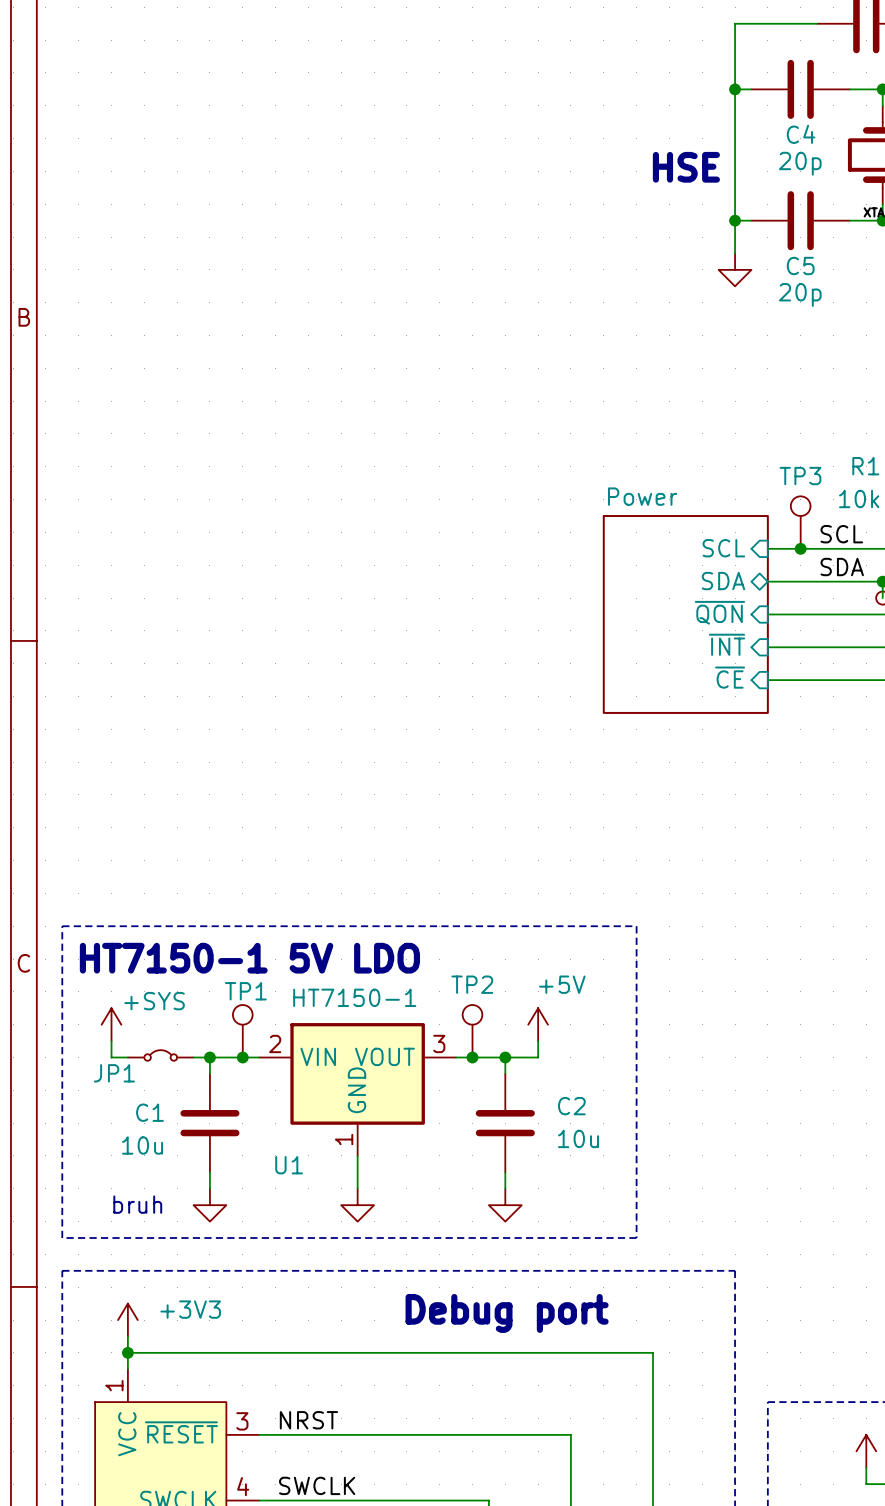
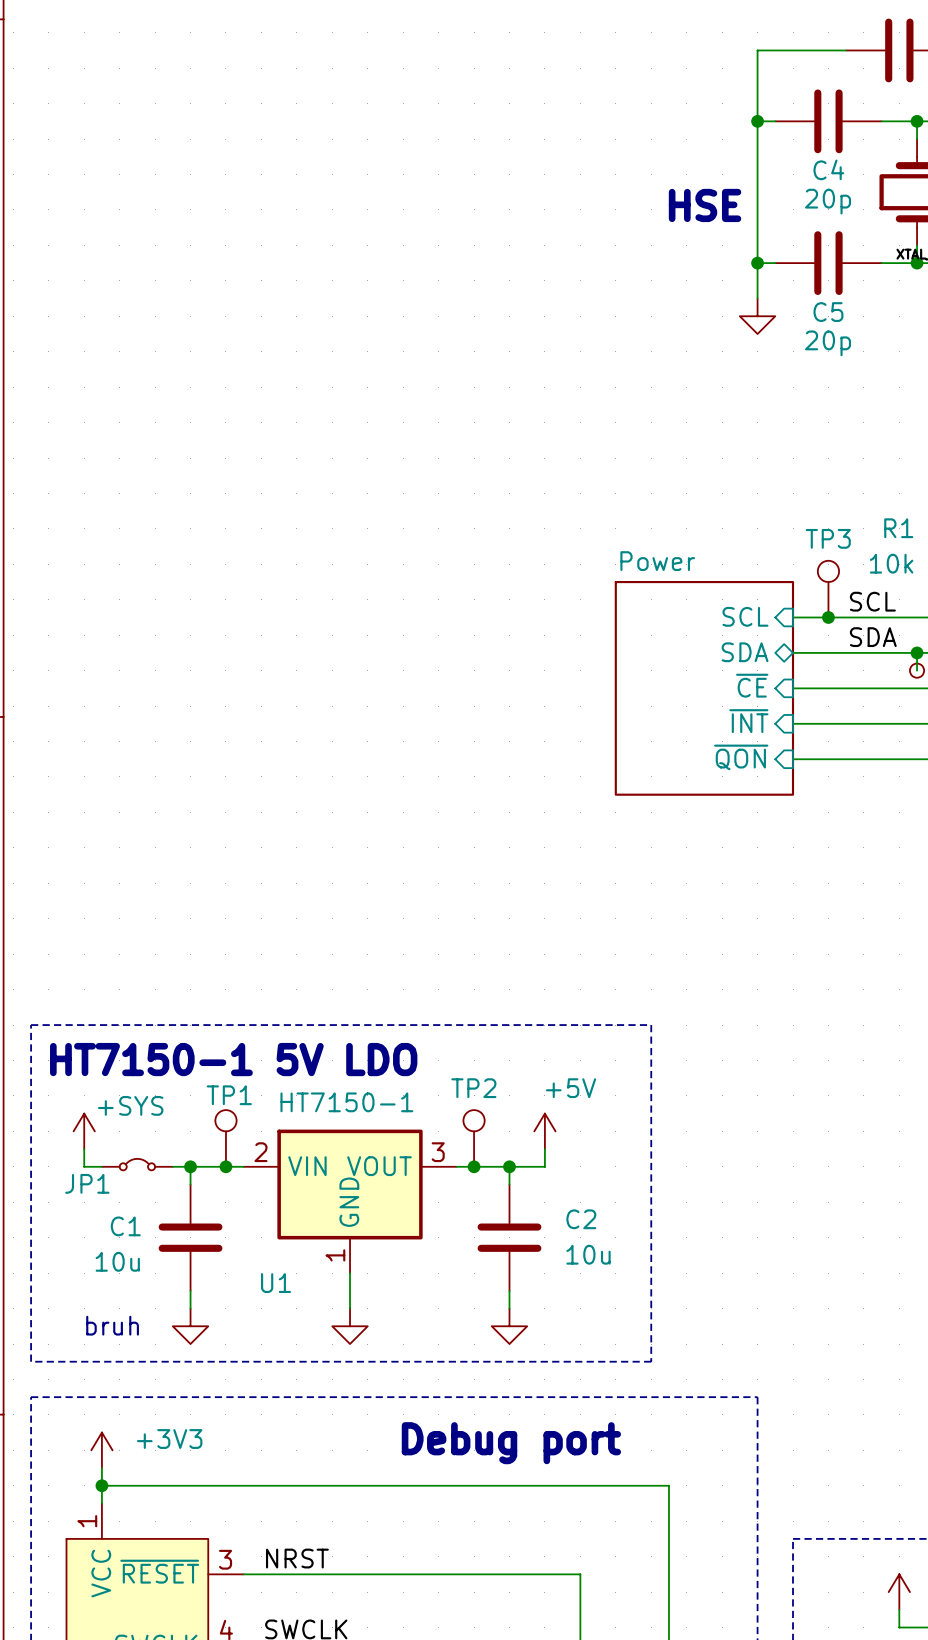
sheet pin: ~{QON} (719, 612) -> ~{CE} (752, 685)
sheet pin: ~{CE} (730, 677) -> ~{QON} (741, 757)

